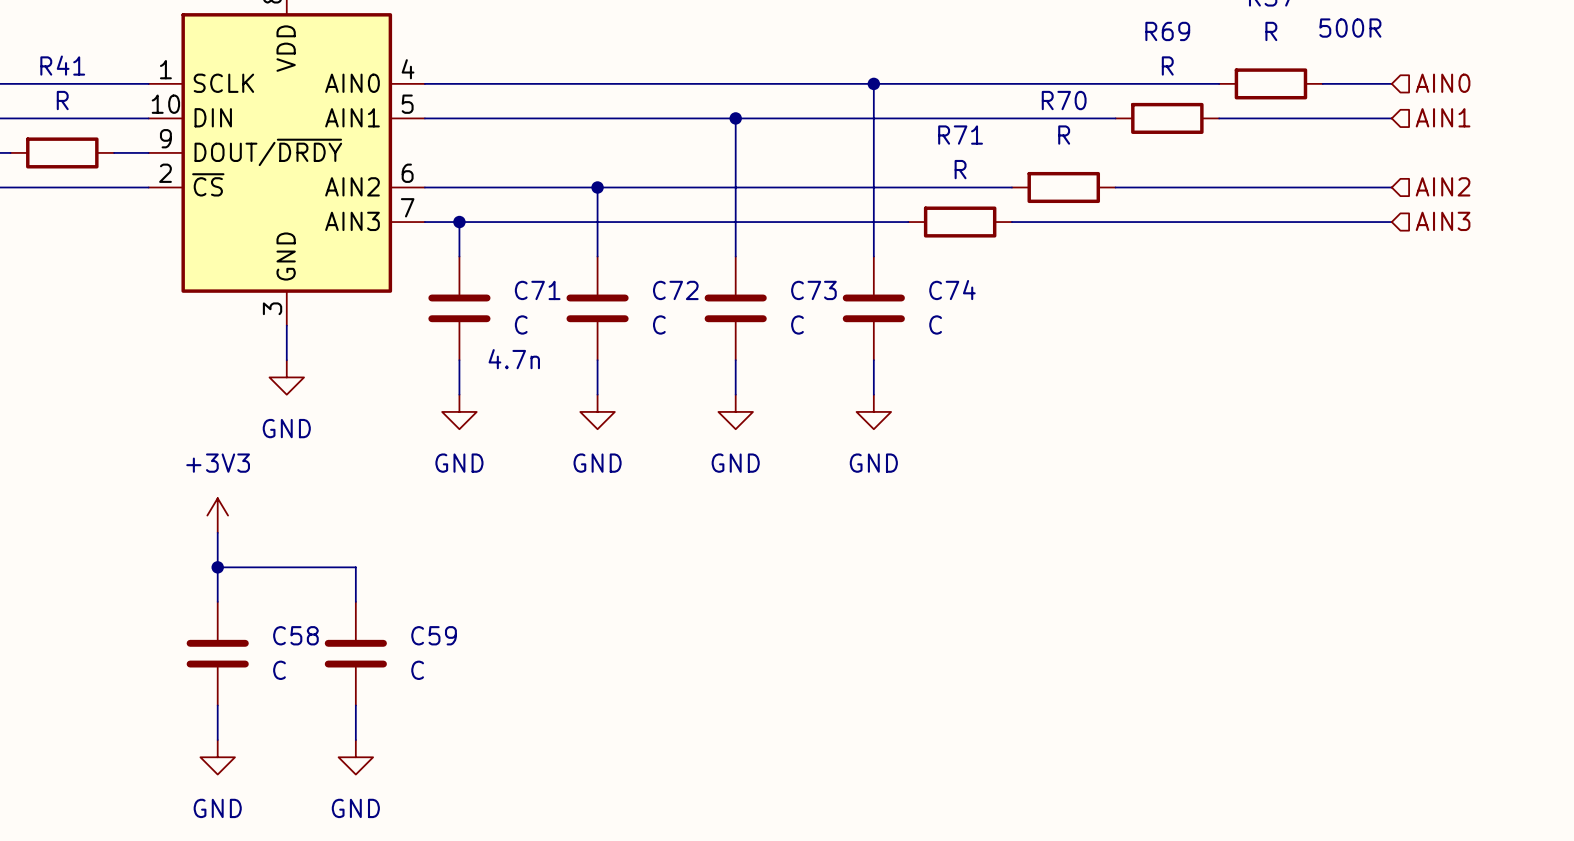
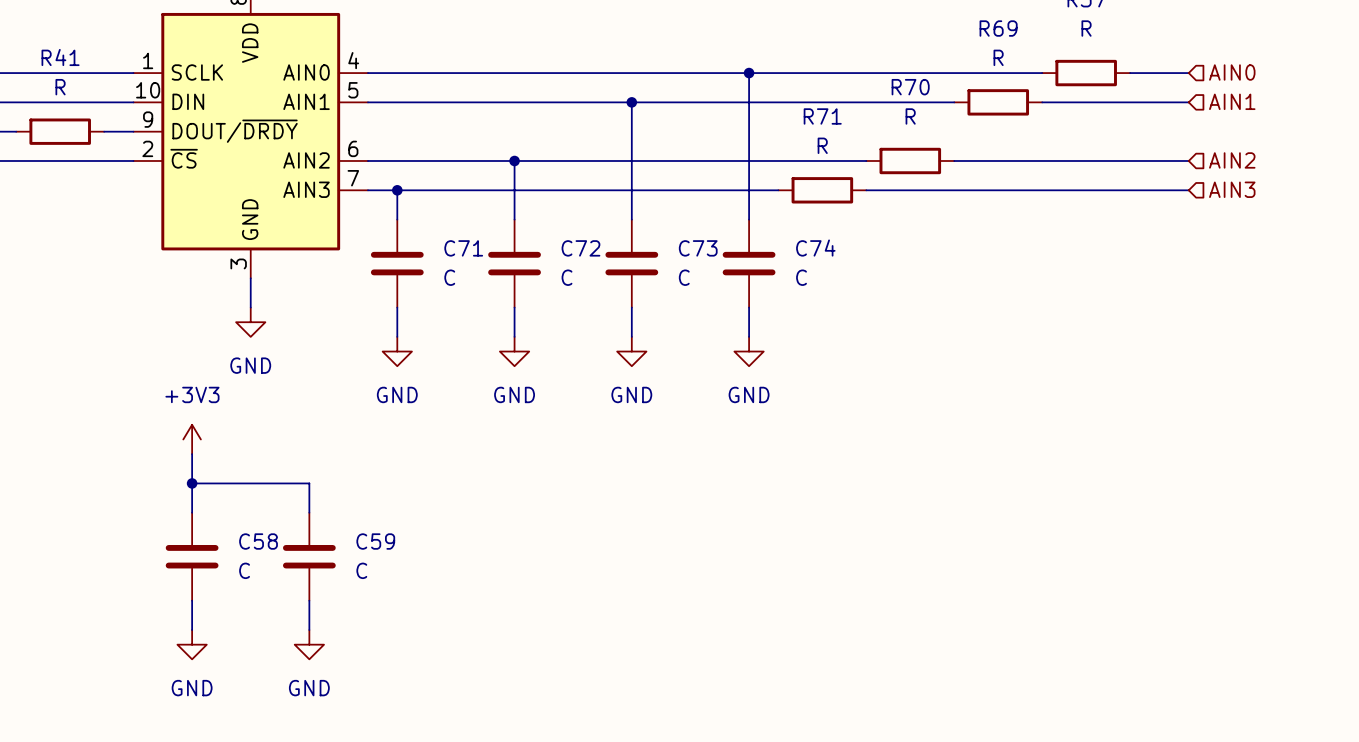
text: 500R (1350, 28) -> none
text: 4.7n (514, 359) -> none

